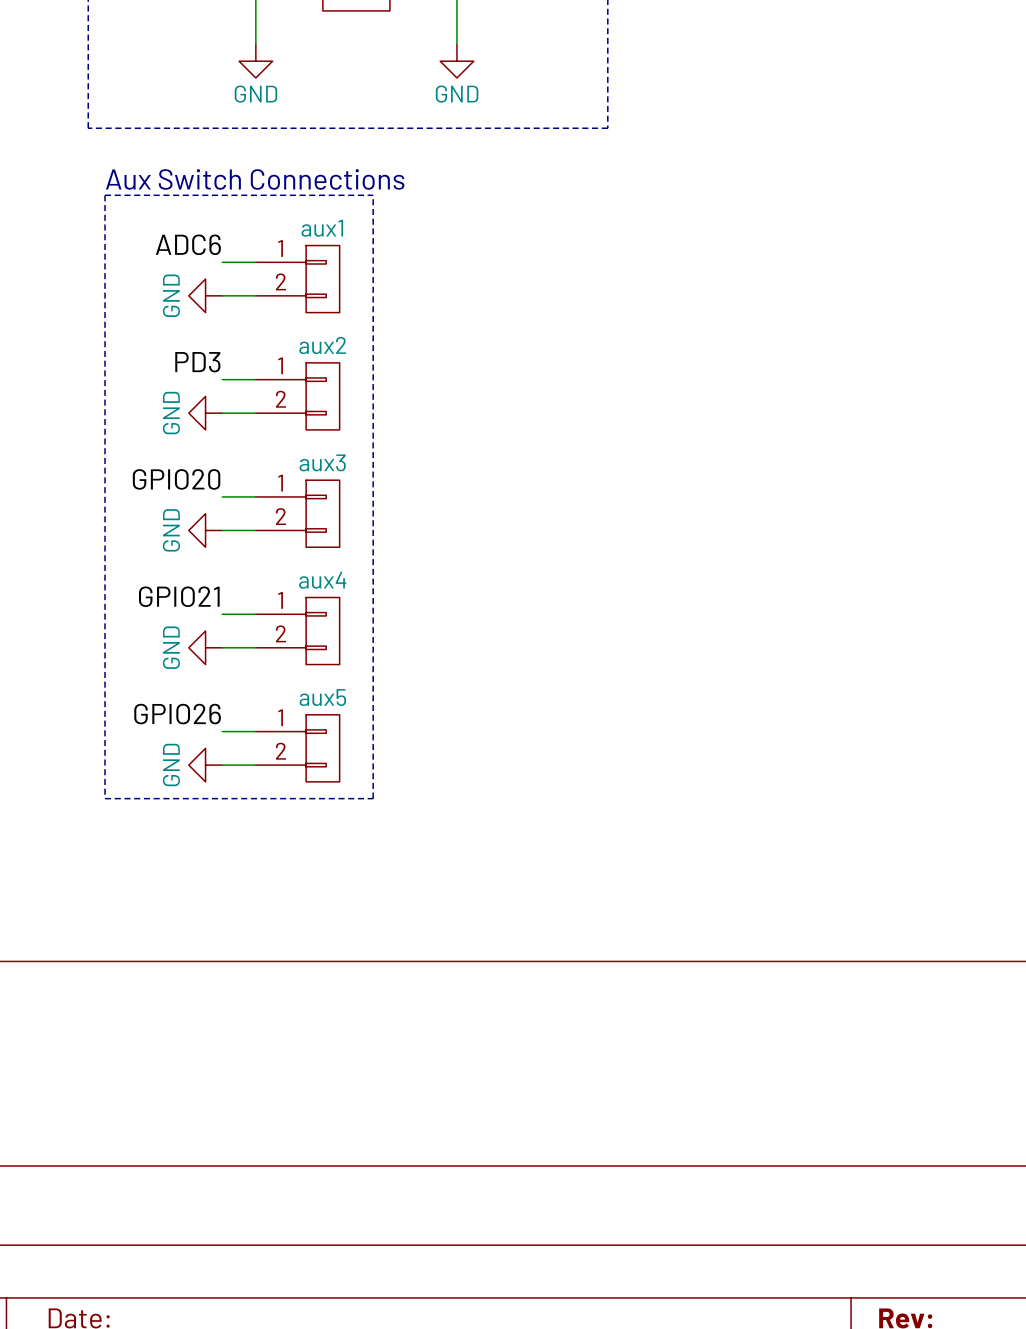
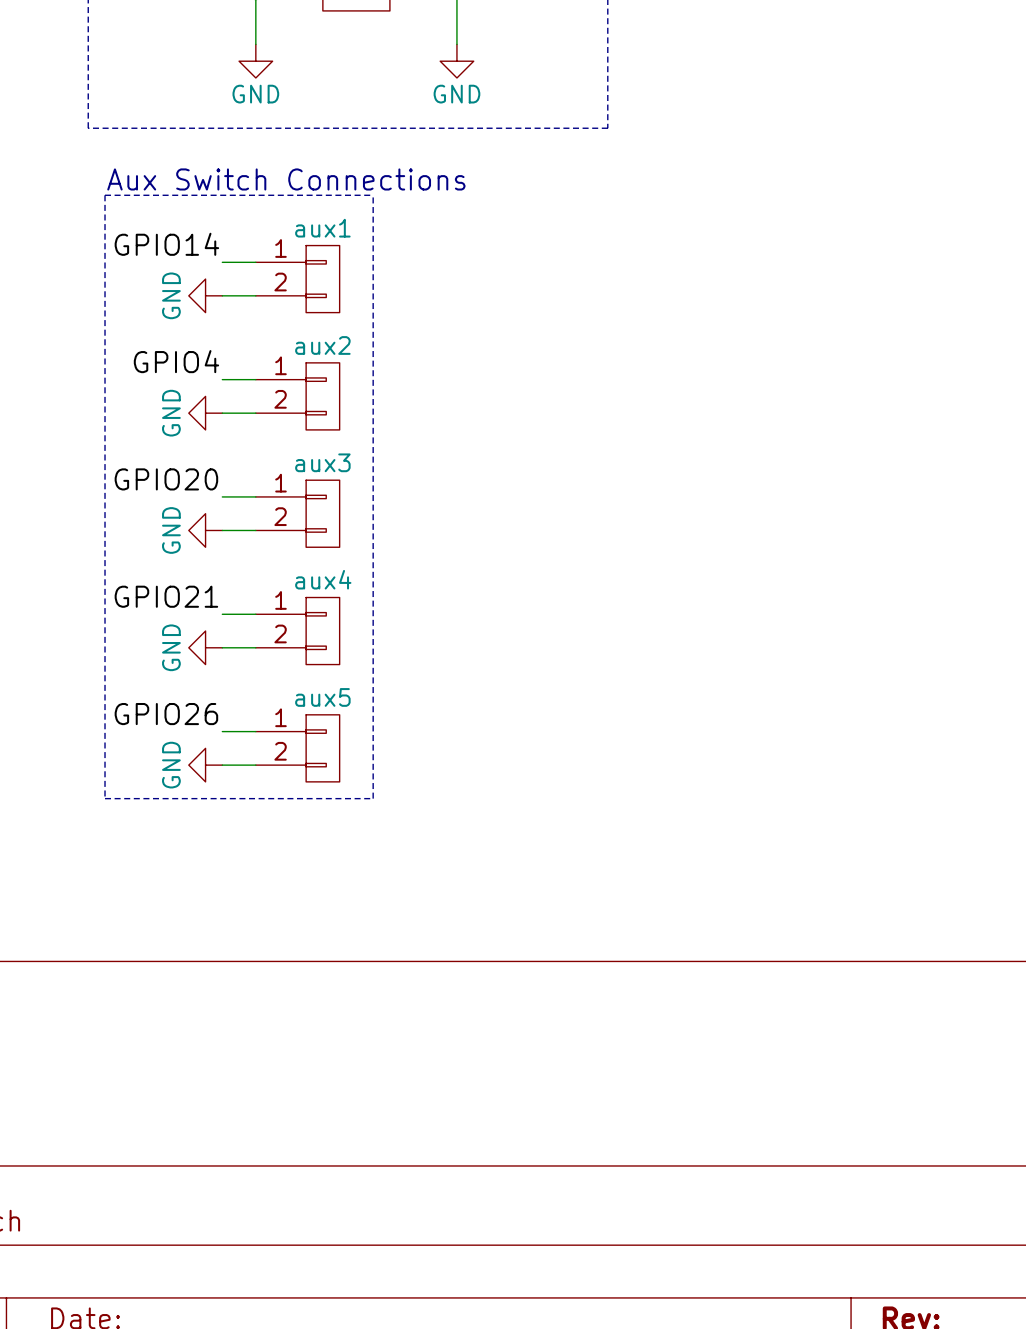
label: ADC6 (188, 244) -> GPIO14 (166, 244)
label: PD3 (197, 362) -> GPIO4 (176, 361)

